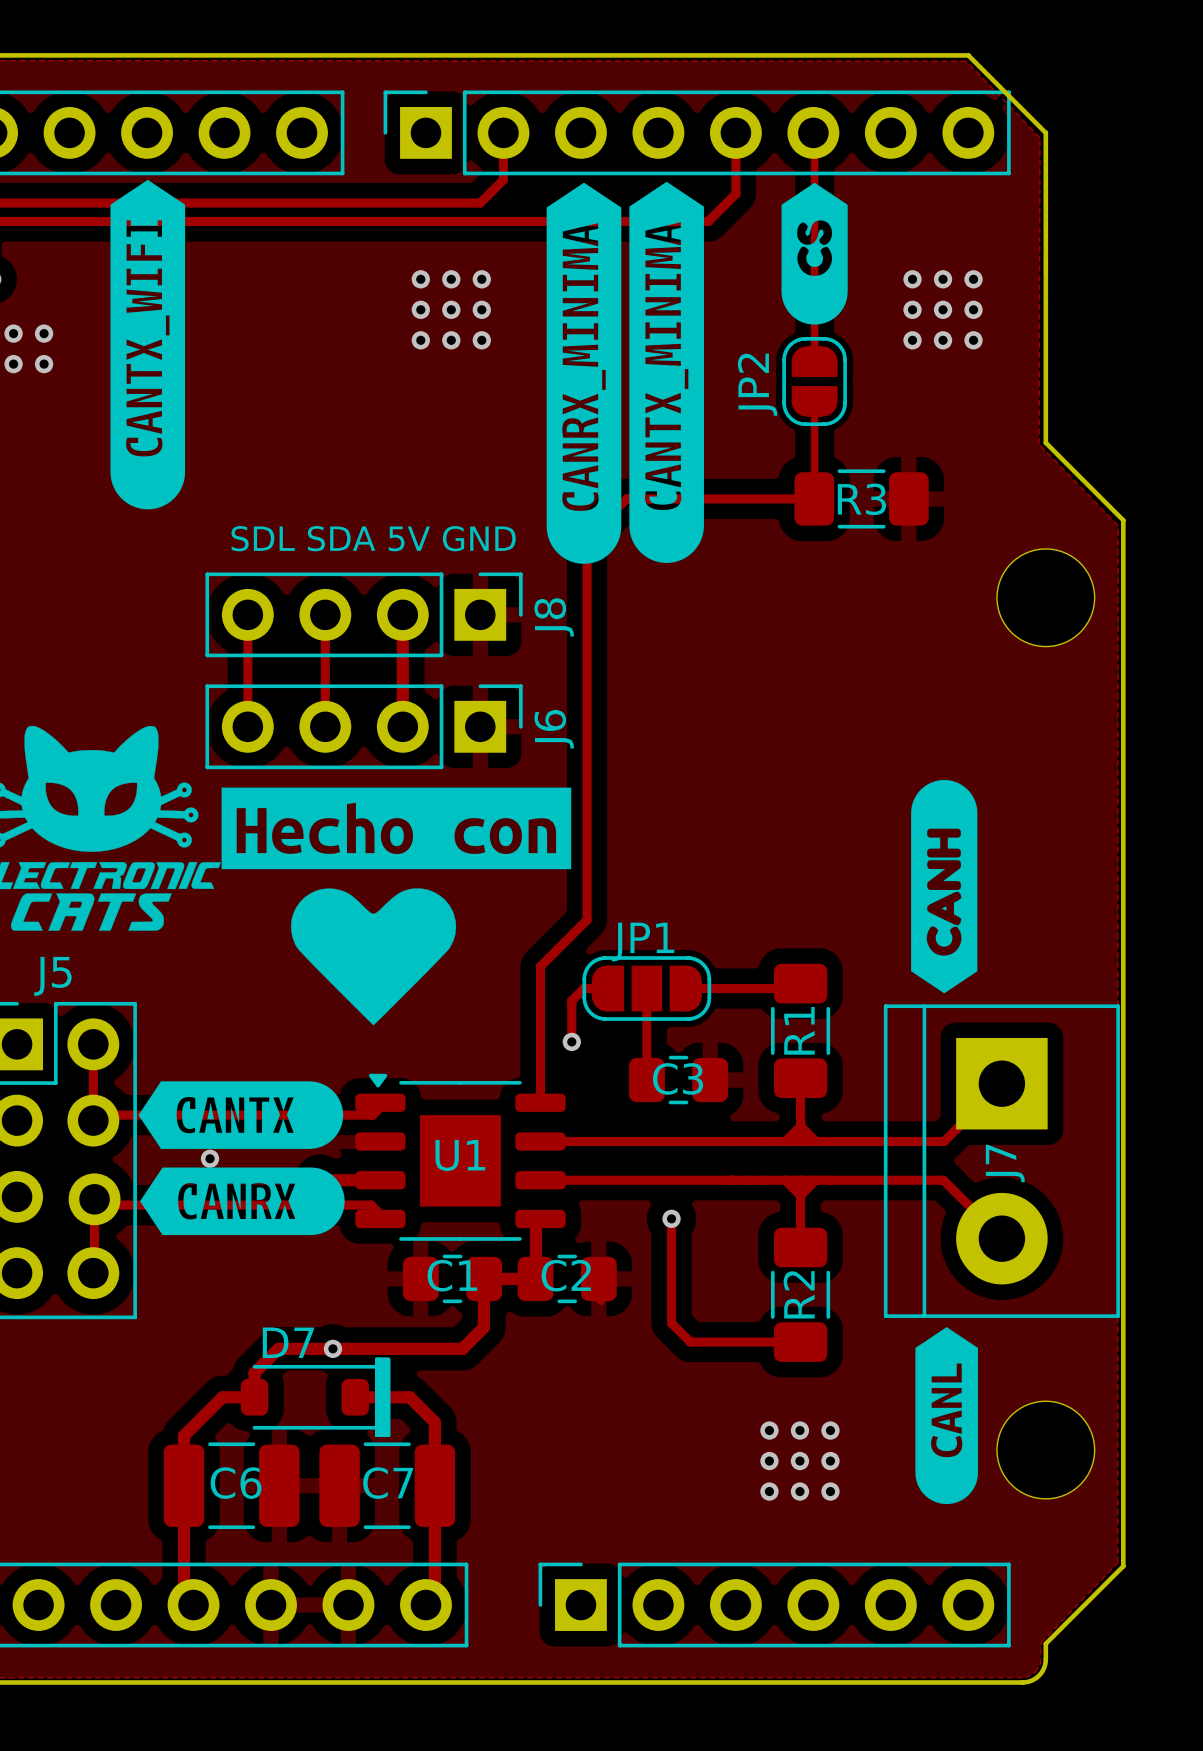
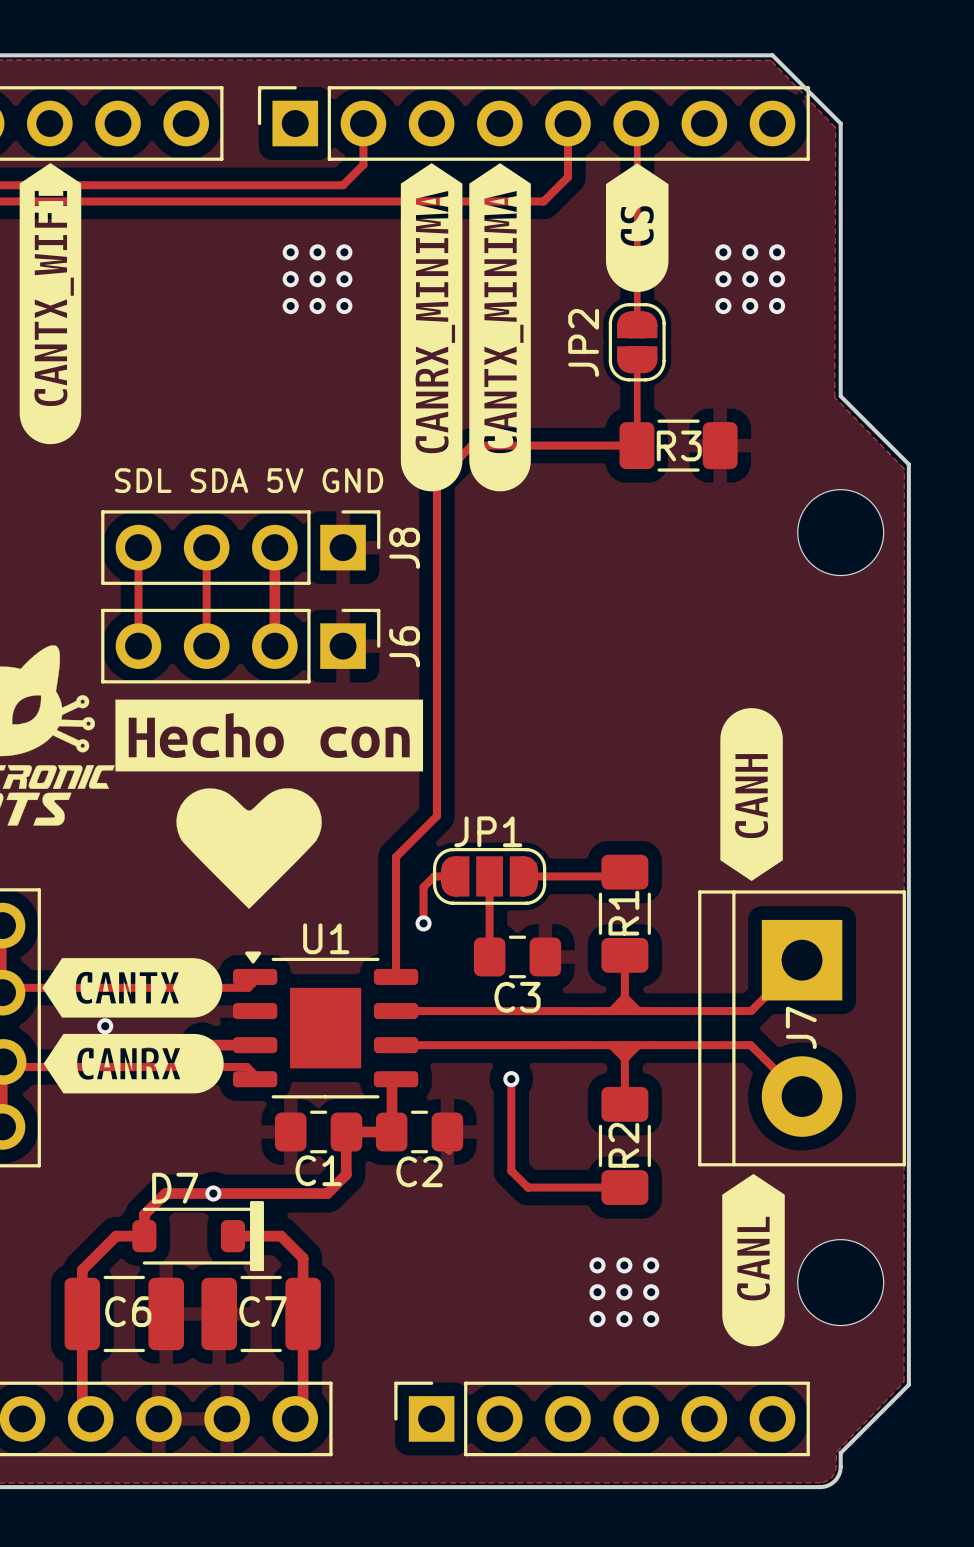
drawing shape: [110, 179, 186, 510] -> [19, 163, 82, 445]
drawing shape: [629, 181, 704, 563] -> [469, 163, 531, 492]
drawing shape: [546, 182, 622, 564] -> [400, 163, 463, 492]
drawing shape: [781, 182, 848, 325] -> [605, 163, 669, 293]
drawing shape: [911, 779, 978, 994] -> [720, 708, 783, 882]
C3 name position: C3 (678, 1078) -> C3 (517, 997)
U1 name position: U1 (460, 1155) -> U1 (326, 938)
C1 name position: C1 (452, 1275) -> C1 (318, 1170)
C2 name position: C2 (566, 1275) -> C2 (419, 1171)
drawing shape: [915, 1327, 978, 1505] -> [722, 1173, 785, 1347]

